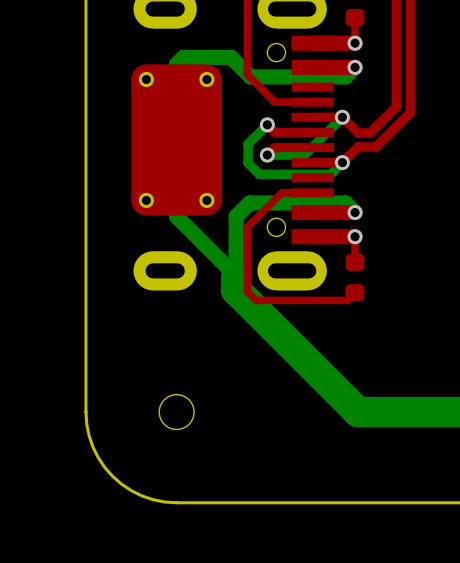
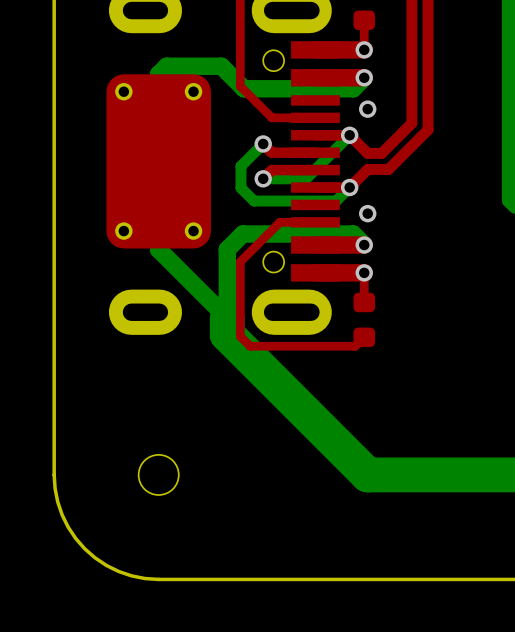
via: none -> (367, 109)
via: none -> (367, 213)

